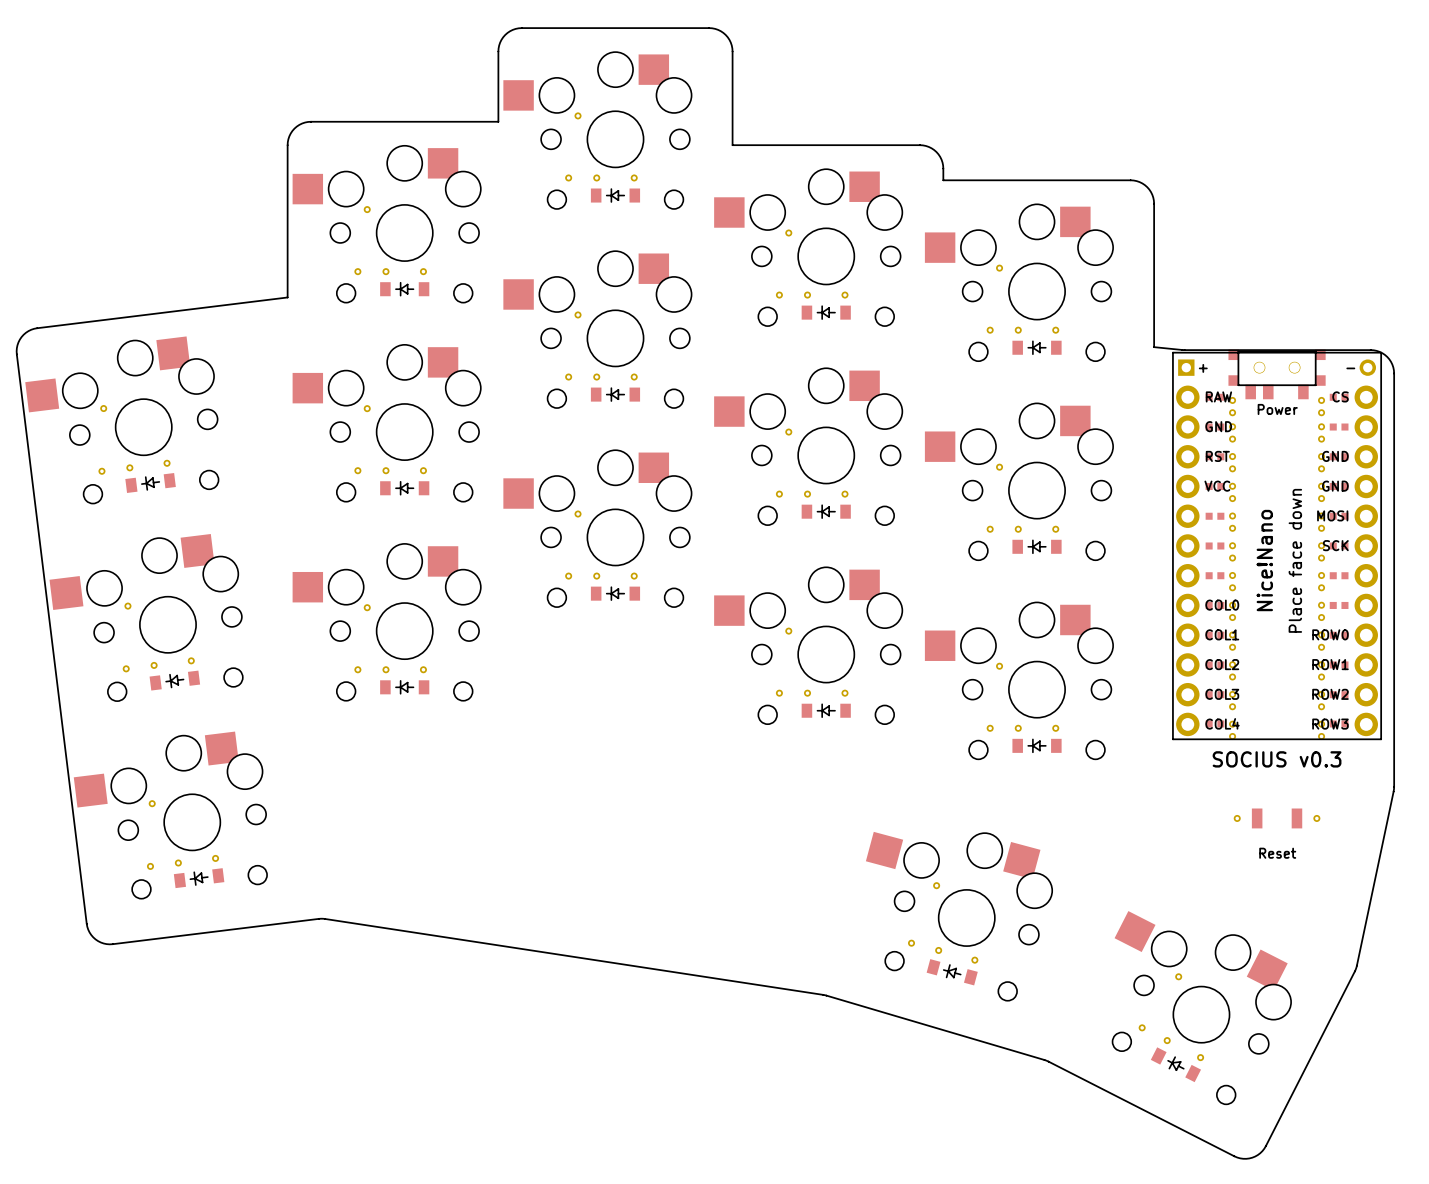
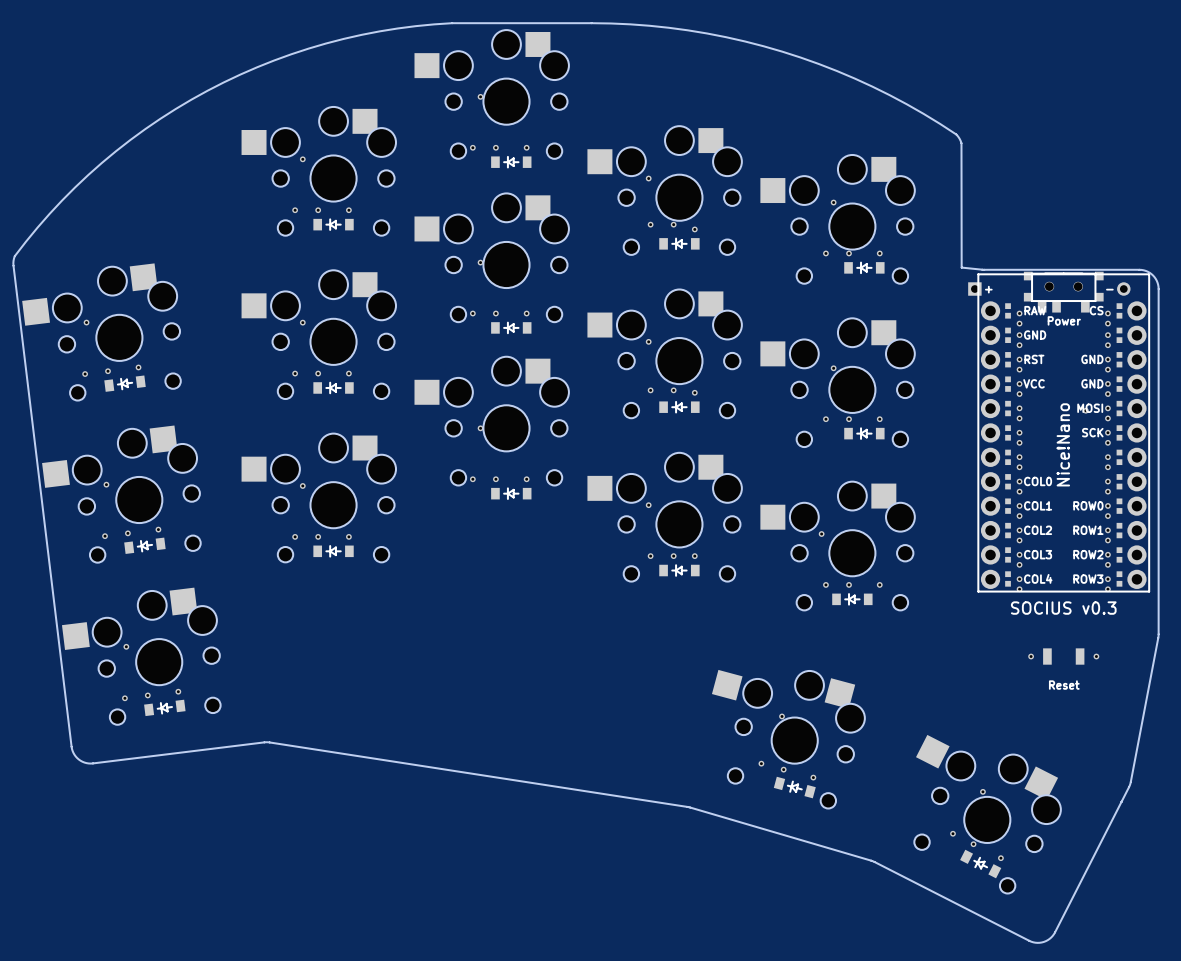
board edge: (521, 28) (709, 28) (720, 31) (727, 37) (732, 48) (732, 145) (922, 145) (931, 148) (940, 156) (943, 165) (943, 180) (1130, 180) (1139, 182) (1149, 189) (1153, 200) (1154, 347) (1184, 350) (1370, 350) (1382, 353) (1391, 361) (1394, 373) (1393, 791) (1356, 968) (1265, 1146) (1257, 1155) (1246, 1158) (1234, 1156) (1046, 1060) (824, 995) (323, 918) (112, 944) (98, 941) (89, 932) (86, 923) (16, 354) (18, 342) (25, 332) (37, 328) (287, 297) (287, 145) (292, 130) (299, 124) (311, 121) (498, 121) (499, 45) (507, 32) (521, 28) -> (452, 23) (379, 31) (326, 43) (274, 60) (207, 90) (160, 118) (101, 162) (49, 213) (14, 256) (13, 265) (71, 746) (74, 754) (82, 761) (90, 763) (268, 742) (688, 807) (872, 861) (1029, 940) (1037, 942) (1047, 940) (1055, 932) (1130, 784) (1158, 637) (1158, 289) (1155, 278) (1149, 272) (1141, 269) (984, 269) (961, 267) (961, 143) (958, 136) (923, 113) (889, 95) (818, 64) (744, 41) (668, 27) (610, 23) (452, 23)
part position: (578, 115) -> (480, 96)
part: (568, 177) -> none
part: (596, 177) -> none
part: (634, 177) -> none
part: none -> (472, 147)
part: none -> (495, 147)
part position: (615, 195) -> (511, 162)
part: none -> (526, 147)
part position: (999, 268) -> (833, 202)
part: none -> (650, 224)
part: none -> (673, 224)
part: (779, 295) -> none
part: (807, 295) -> none
part position: (578, 314) -> (480, 262)
part: none -> (825, 253)
part: none -> (849, 253)
part: none -> (879, 253)
part: (990, 330) -> none
part: (1018, 330) -> none
part: (1055, 330) -> none
part position: (1037, 347) -> (864, 267)
part position: (1277, 374) -> (1063, 292)
part: (568, 377) -> none
part: (596, 377) -> none
part: (634, 377) -> none
part position: (615, 394) -> (511, 327)
part: none -> (472, 313)
part: none -> (495, 313)
part: none -> (526, 313)
part: none -> (1019, 313)
part: none -> (1107, 313)
part: (1232, 400) -> none
part: (1321, 400) -> none
part: none -> (1019, 323)
part: none -> (1107, 323)
part: (1232, 412) -> none
part: (1321, 412) -> none
part: none -> (1019, 335)
part: none -> (1107, 335)
part: (1232, 426) -> none
part: (1321, 426) -> none
part: none -> (1019, 345)
part: none -> (1107, 345)
part: (1232, 439) -> none
part: (1321, 439) -> none
part: none -> (1019, 359)
part: none -> (1107, 359)
part: (1232, 456) -> none
part: (1321, 456) -> none
part: none -> (1019, 369)
part: none -> (1107, 369)
part position: (999, 467) -> (833, 368)
part: (1232, 468) -> none
part: (1321, 468) -> none
part: none -> (1019, 383)
part: none -> (1107, 383)
part: (1232, 486) -> none
part: (1321, 486) -> none
part: none -> (650, 390)
part: none -> (673, 390)
part: (779, 494) -> none
part: (807, 494) -> none
part: none -> (1019, 394)
part: none -> (1107, 394)
part: (1232, 498) -> none
part: (1321, 498) -> none
part: none -> (1019, 408)
part: none -> (1107, 408)
part: (578, 514) -> none
part: (1232, 516) -> none
part: none -> (1019, 418)
part: none -> (1107, 418)
part: none -> (825, 419)
part: none -> (849, 419)
part: none -> (879, 419)
part: (1232, 528) -> none
part: (1321, 528) -> none
part: (990, 529) -> none
part: (1018, 529) -> none
part: (1055, 529) -> none
part: none -> (480, 428)
part: none -> (1019, 432)
part: none -> (1107, 432)
part: none -> (1063, 432)
part: (1232, 545) -> none
part: (1277, 545) -> none
part: (1321, 545) -> none
part position: (1037, 546) -> (864, 433)
part: none -> (1019, 442)
part: none -> (1107, 442)
part: (1232, 558) -> none
part: (1321, 558) -> none
part: none -> (1019, 457)
part: none -> (1107, 457)
part: (1232, 575) -> none
part: (1321, 575) -> none
part: (568, 576) -> none
part: (596, 576) -> none
part: (634, 576) -> none
part: none -> (1019, 467)
part: none -> (1107, 467)
part: (1232, 587) -> none
part: (1321, 587) -> none
part position: (615, 593) -> (511, 493)
part: none -> (472, 479)
part: none -> (495, 479)
part: none -> (526, 479)
part: none -> (1019, 481)
part: none -> (1107, 481)
part: (1232, 605) -> none
part: (1321, 605) -> none
part: none -> (1019, 491)
part: none -> (1107, 491)
part: (1232, 617) -> none
part: (1321, 617) -> none
part: none -> (1019, 505)
part: none -> (1107, 505)
part: (1232, 634) -> none
part: (1321, 634) -> none
part: none -> (1019, 516)
part: none -> (1107, 516)
part: (1232, 647) -> none
part: (1321, 647) -> none
part: none -> (1019, 530)
part: none -> (1107, 530)
part: (1232, 664) -> none
part: (1321, 664) -> none
part: none -> (1019, 540)
part: none -> (1107, 540)
part: (1232, 677) -> none
part: (1321, 677) -> none
part: none -> (1019, 554)
part: none -> (1107, 554)
part: (779, 693) -> none
part: none -> (650, 556)
part: (807, 693) -> none
part: none -> (673, 556)
part: (1232, 694) -> none
part: (1321, 694) -> none
part: none -> (1019, 564)
part: none -> (1107, 564)
part: (1232, 706) -> none
part: (1321, 706) -> none
part: none -> (1019, 579)
part: none -> (1107, 579)
part: (1232, 724) -> none
part: (1321, 724) -> none
part: (990, 728) -> none
part: none -> (825, 584)
part: (1018, 728) -> none
part: none -> (849, 584)
part: (1055, 728) -> none
part: none -> (879, 584)
part: none -> (1019, 589)
part: none -> (1107, 589)
part: (1232, 736) -> none
part: (1321, 736) -> none
part position: (1237, 818) -> (1031, 656)
part position: (1277, 818) -> (1063, 656)
part position: (1316, 818) -> (1096, 656)
part position: (936, 885) -> (782, 716)
part: (911, 943) -> none
part: none -> (761, 763)
part: (938, 950) -> none
part: none -> (783, 769)
part: (974, 960) -> none
part: none -> (813, 777)
part position: (952, 972) -> (794, 787)
part position: (1178, 976) -> (982, 791)
part: (1142, 1027) -> none
part: none -> (952, 833)
part: (1167, 1040) -> none
part: none -> (973, 844)
part: (1200, 1057) -> none
part: none -> (1000, 858)
part position: (1175, 1064) -> (980, 864)

